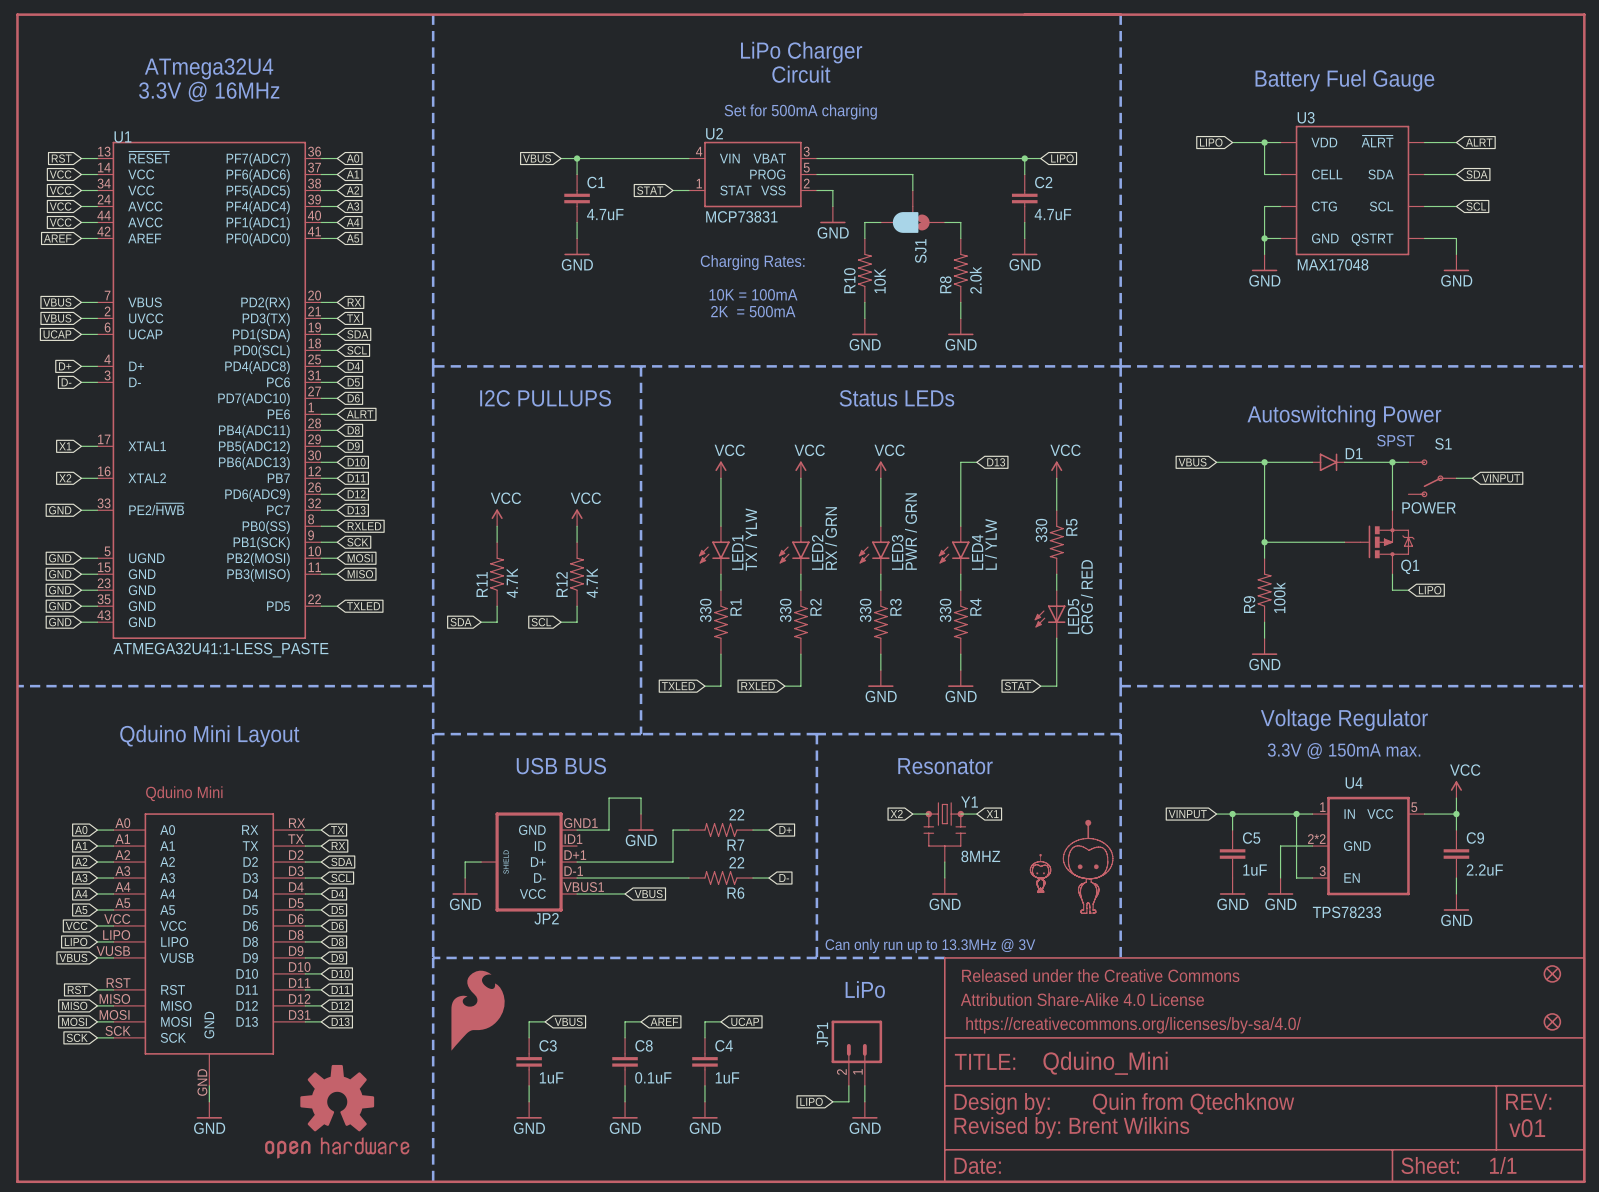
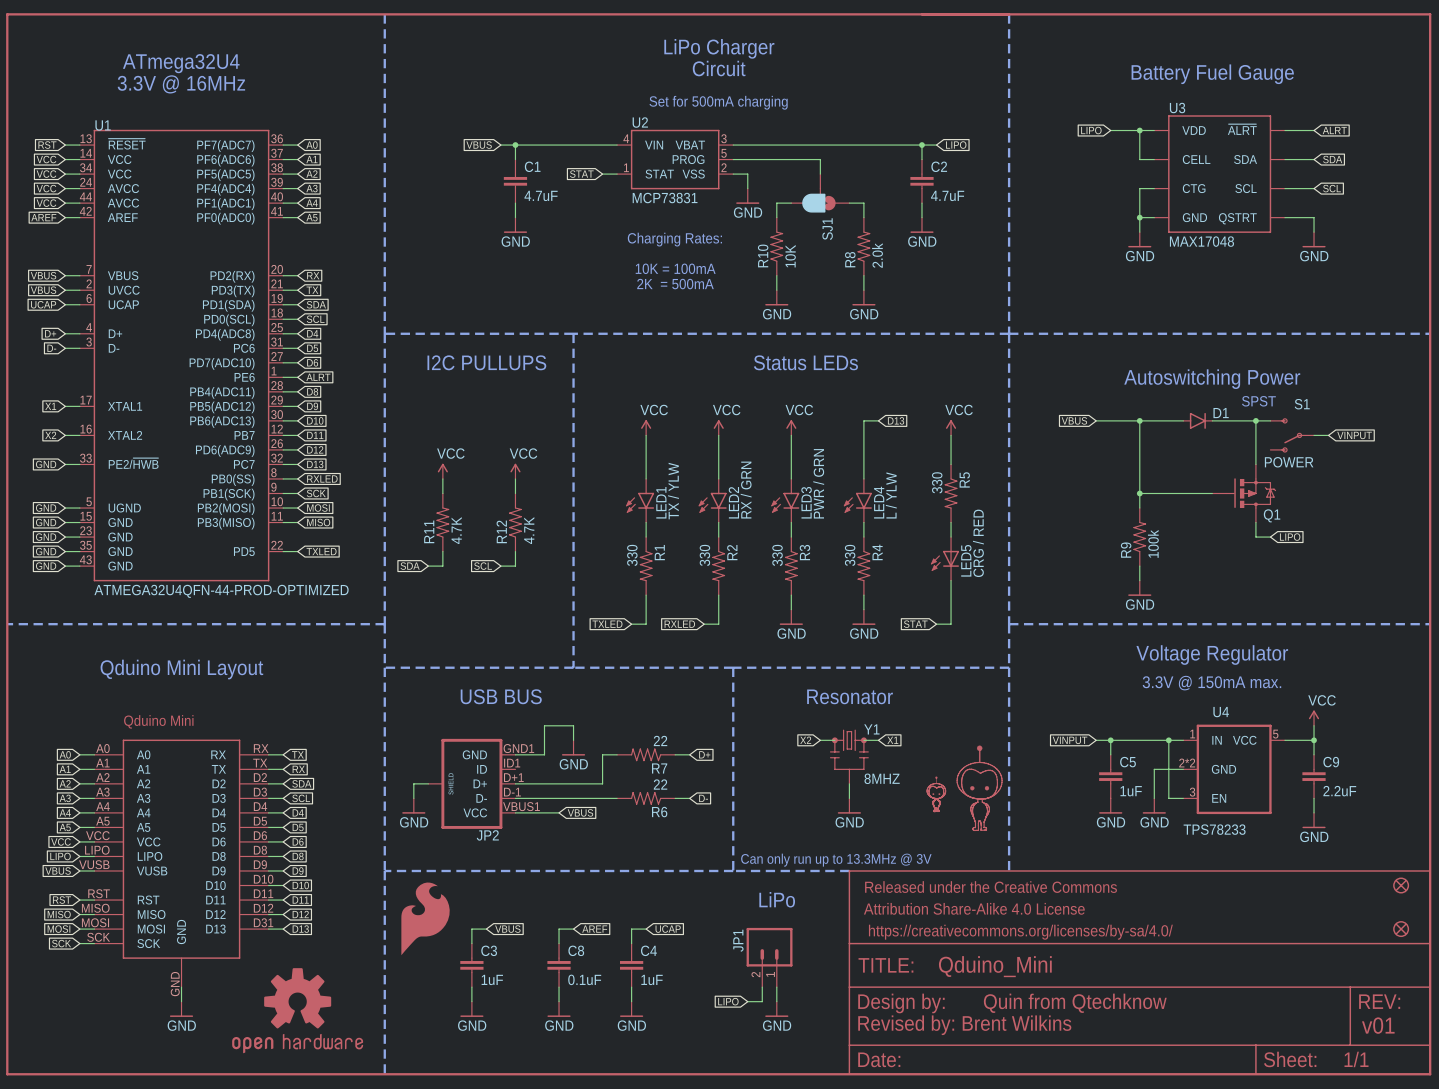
U1 value: ATMEGA32U41:1-LESS_PASTE (220, 650) -> ATMEGA32U4QFN-44-PROD-OPTIMIZED (221, 591)

